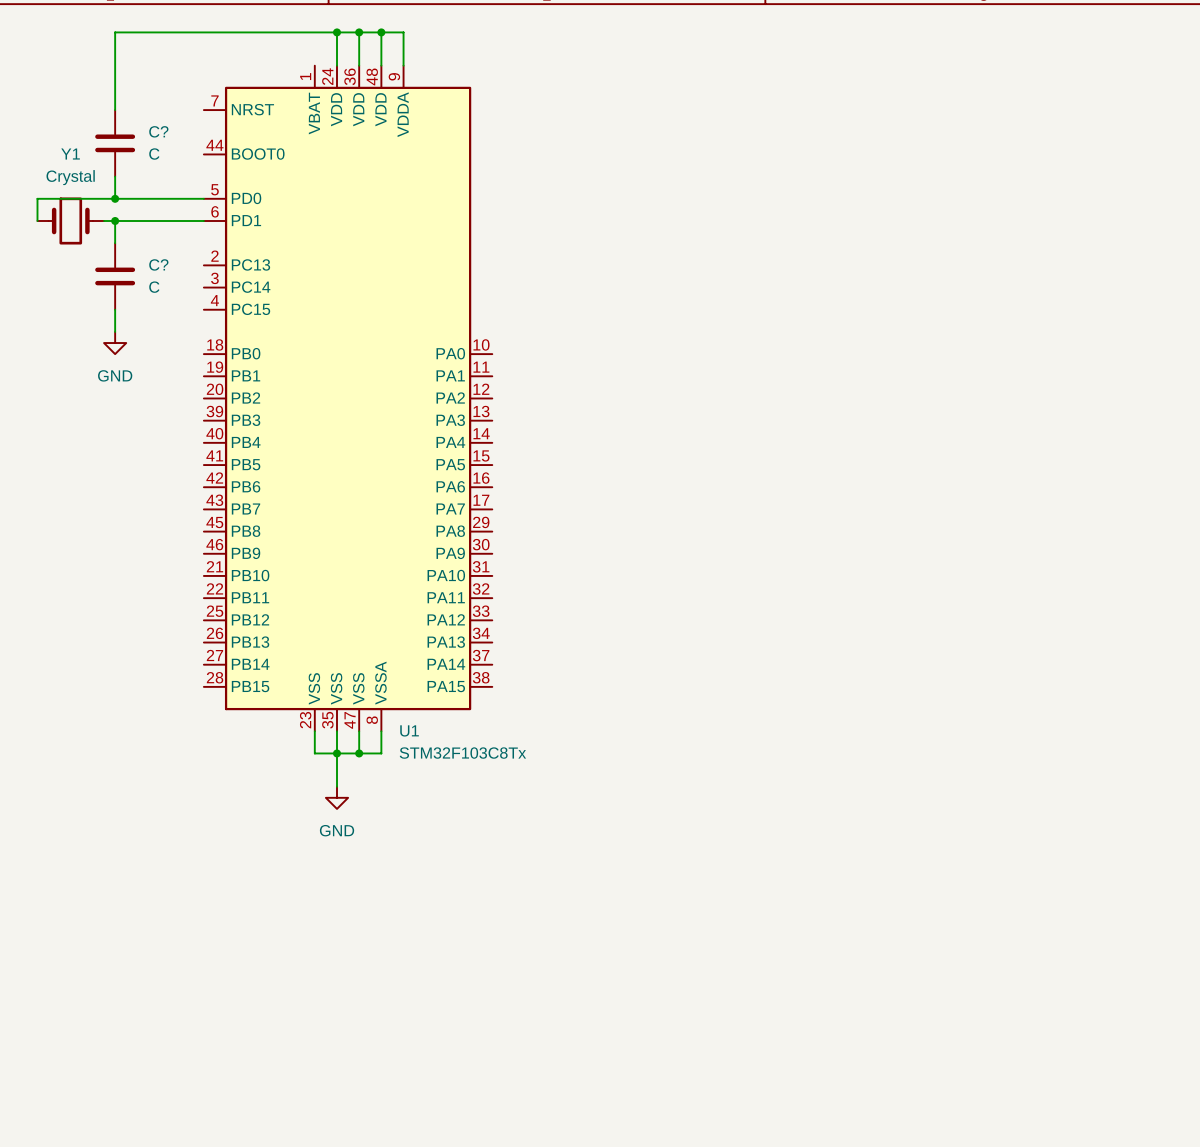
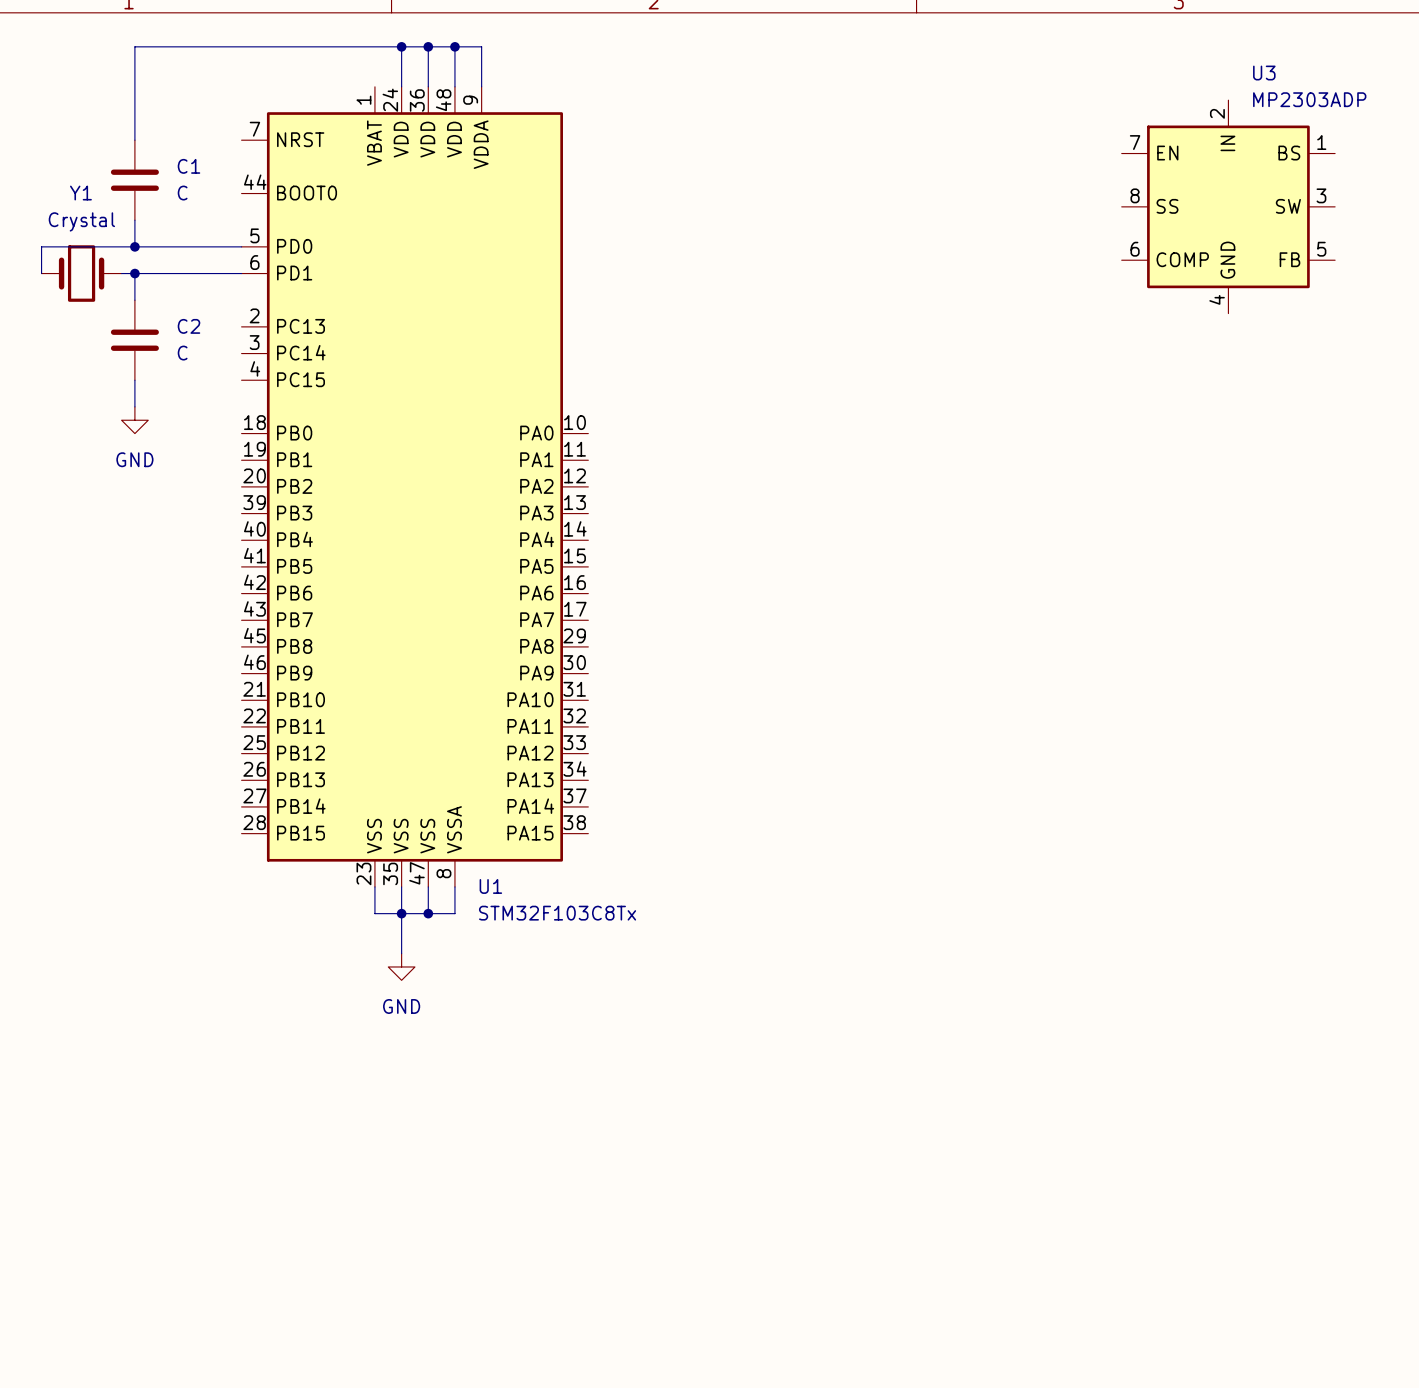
C? name: C? (158, 131) -> C1 (188, 166)
U3: none -> MP2303ADP (1228, 206)
C? name: C? (158, 264) -> C2 (188, 326)

